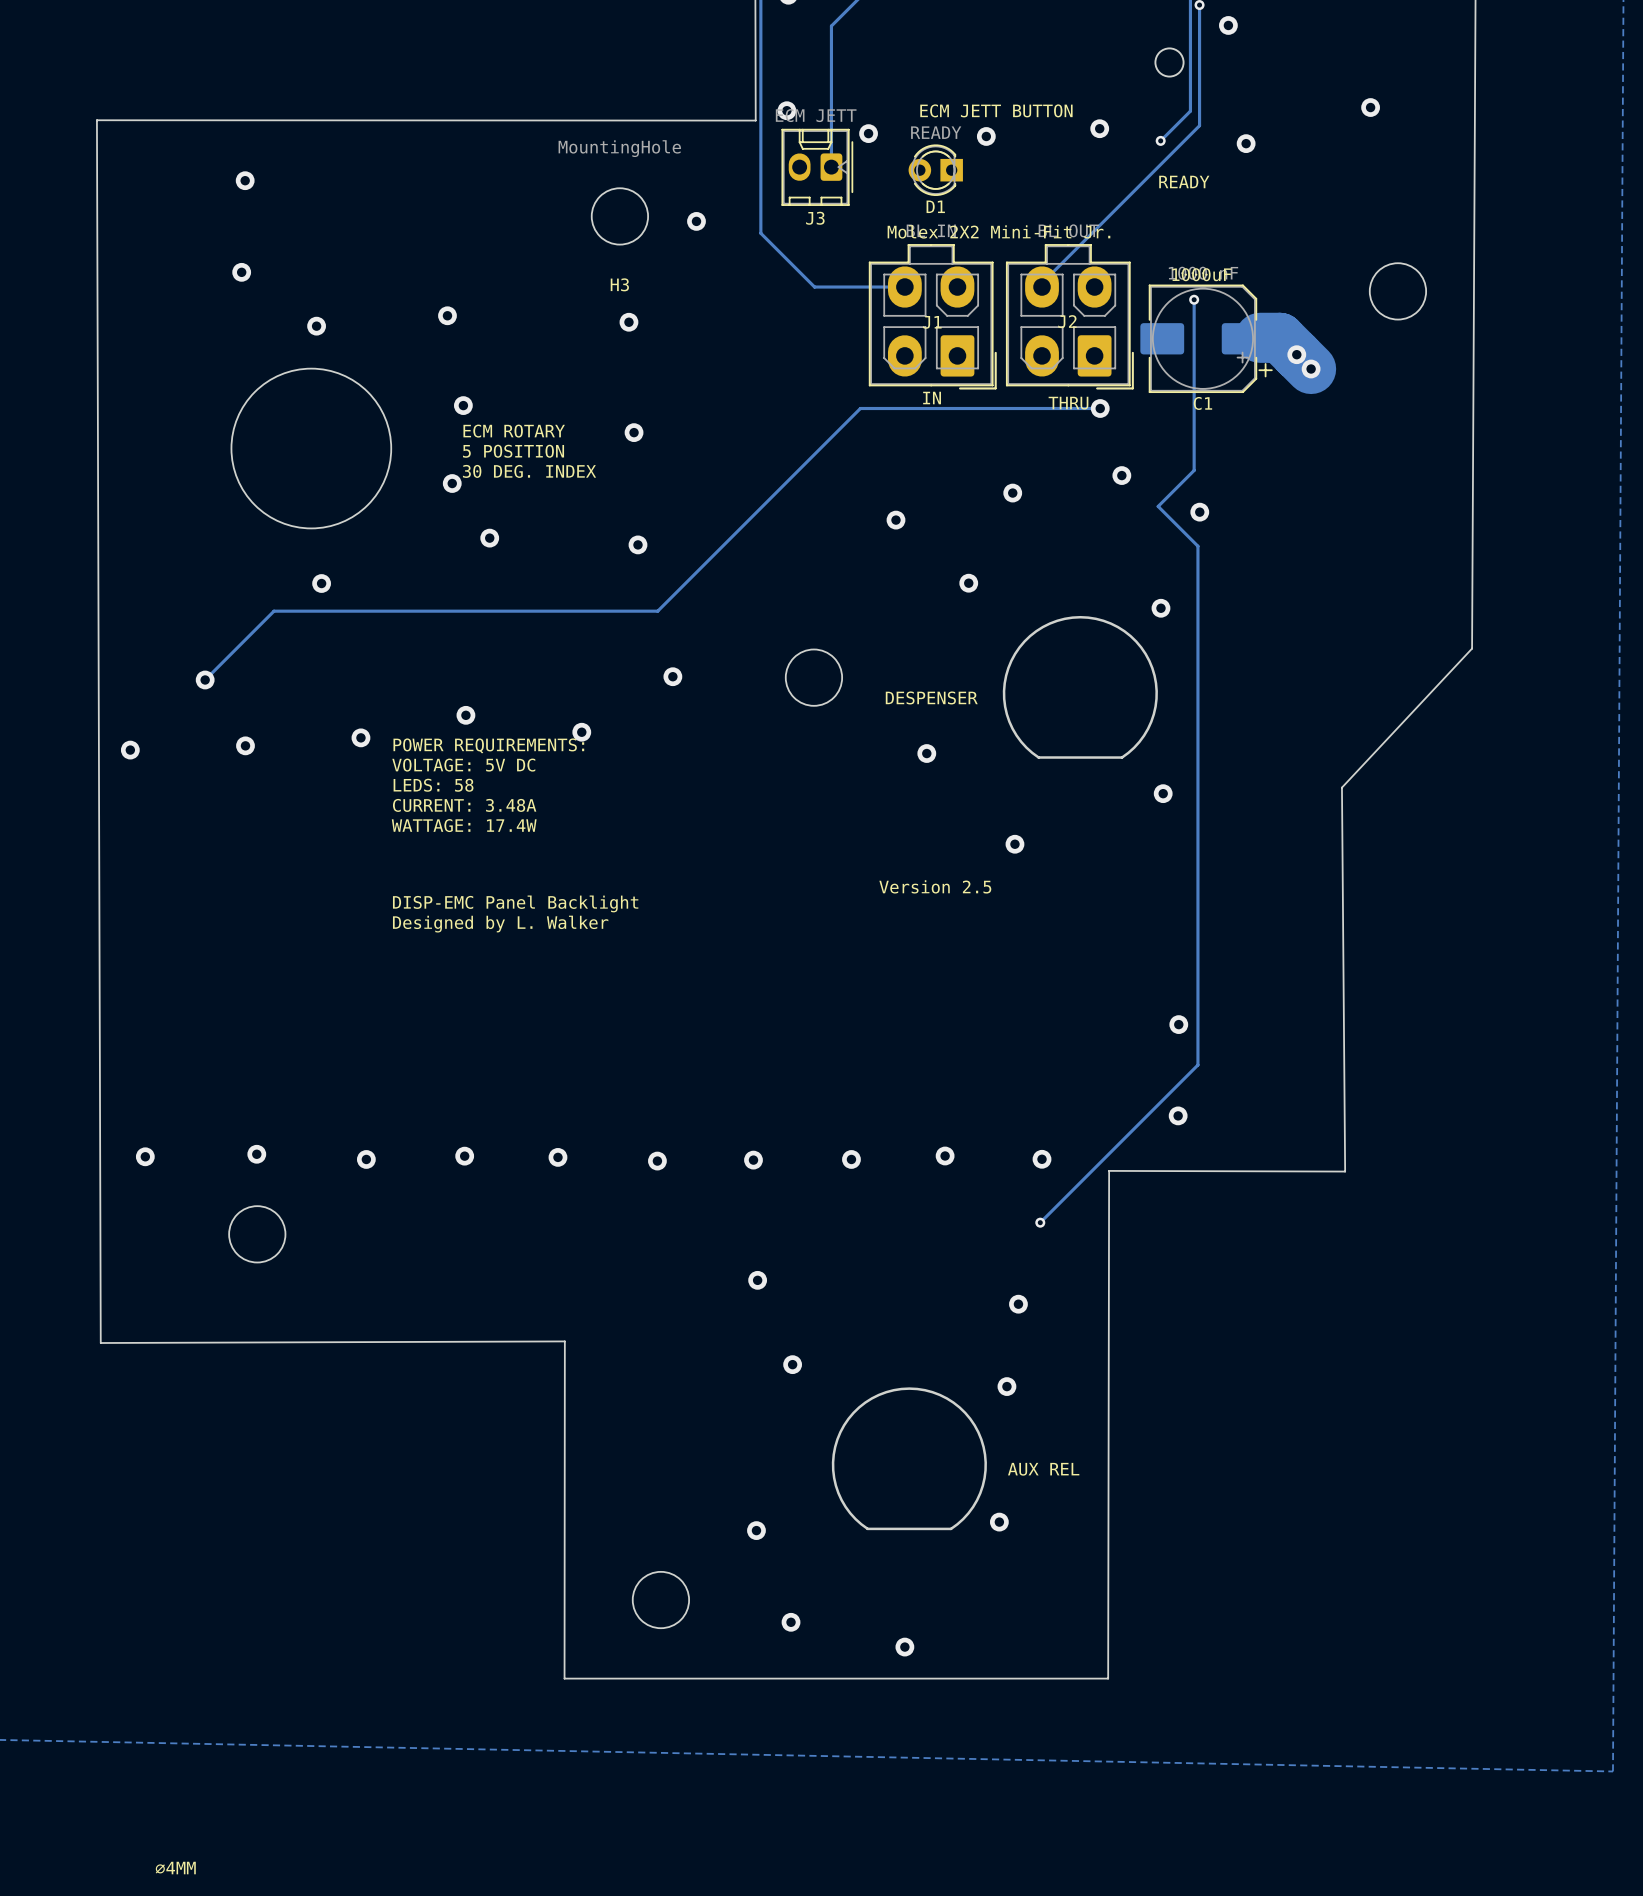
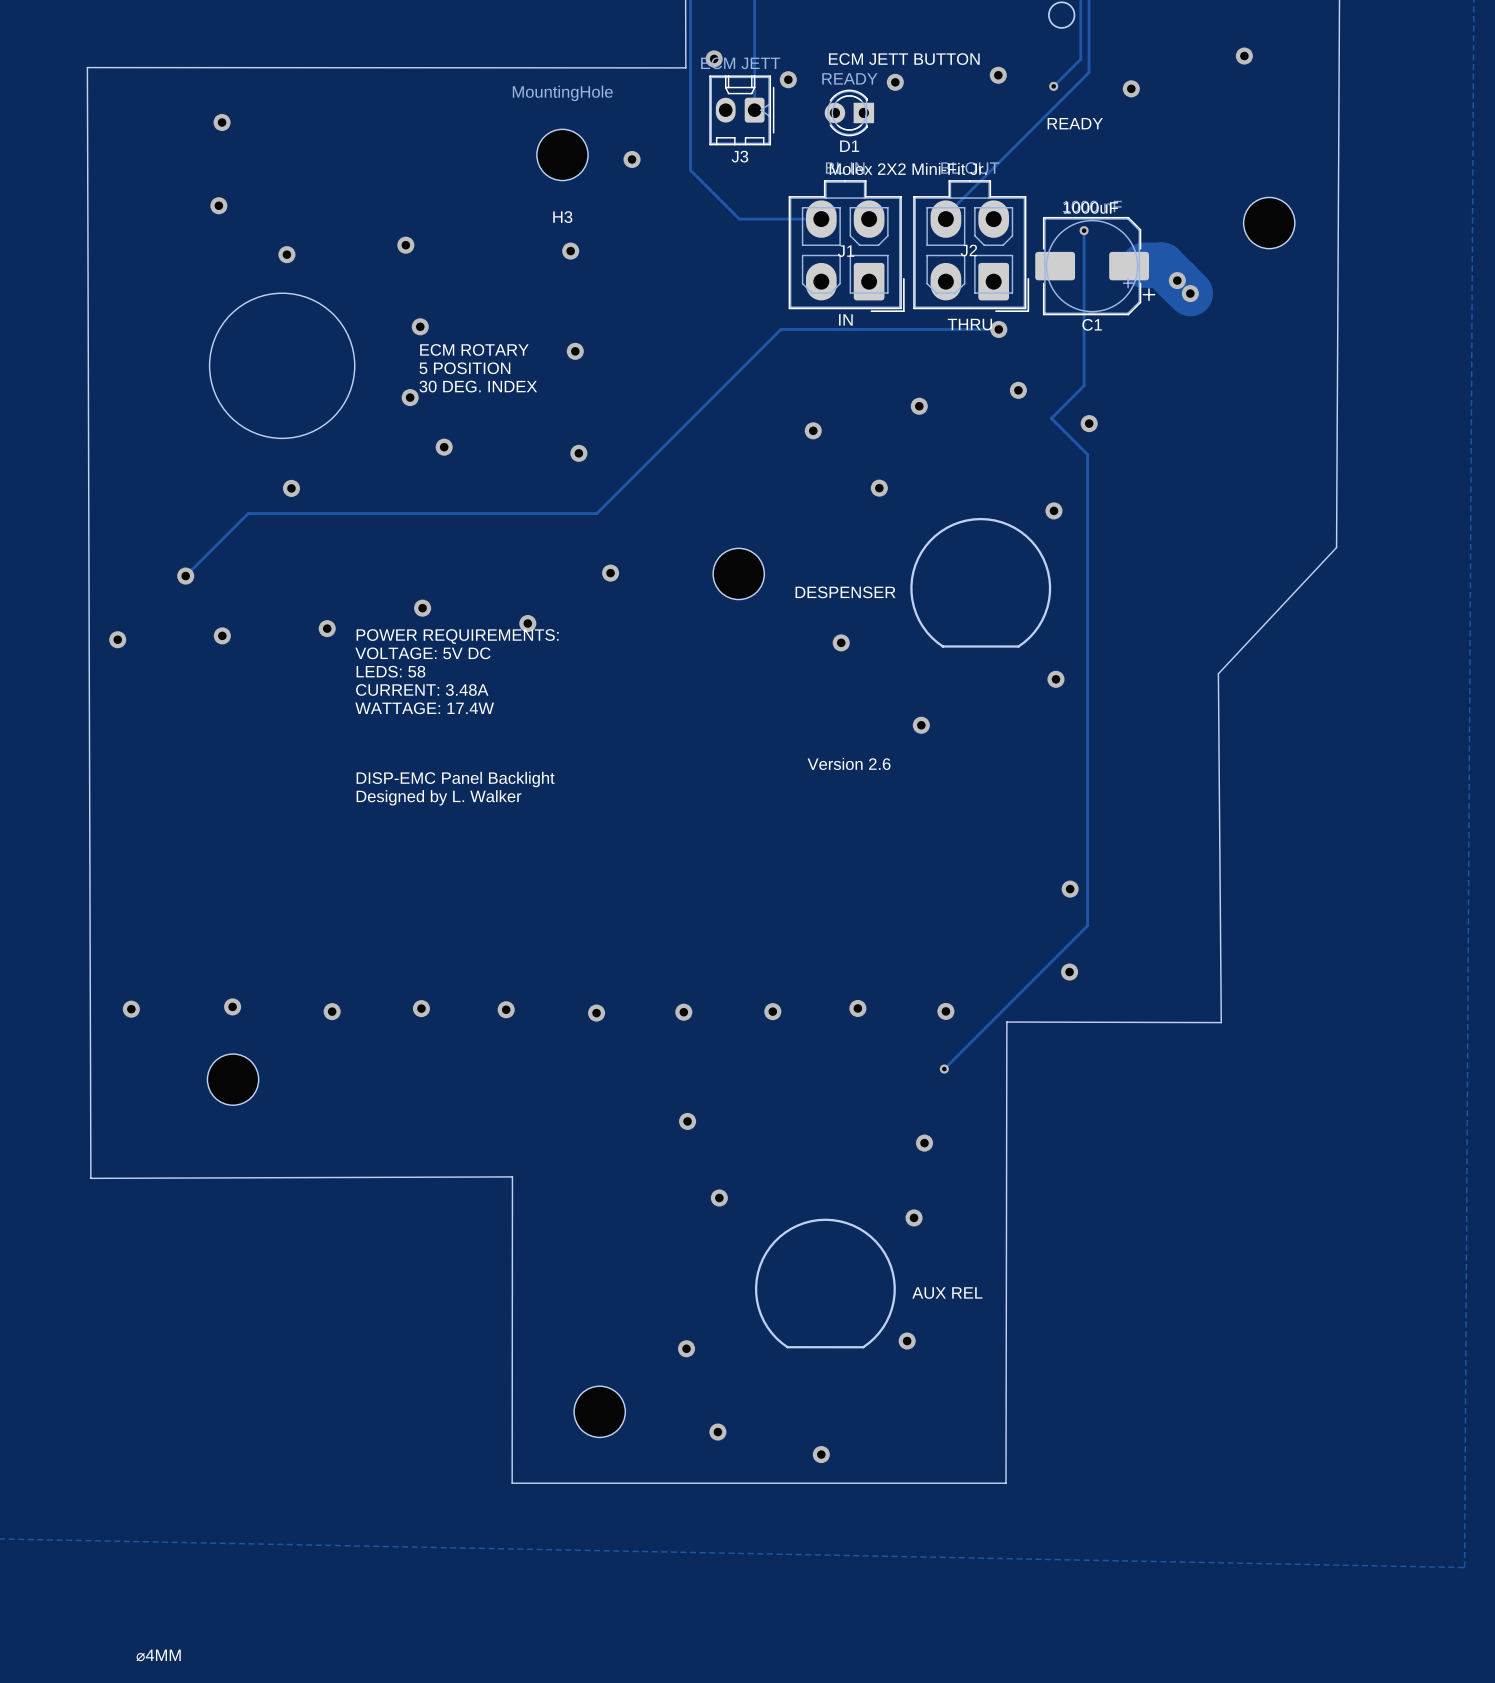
text: Version 2.5 (935, 886) -> Version 2.6 (849, 763)

